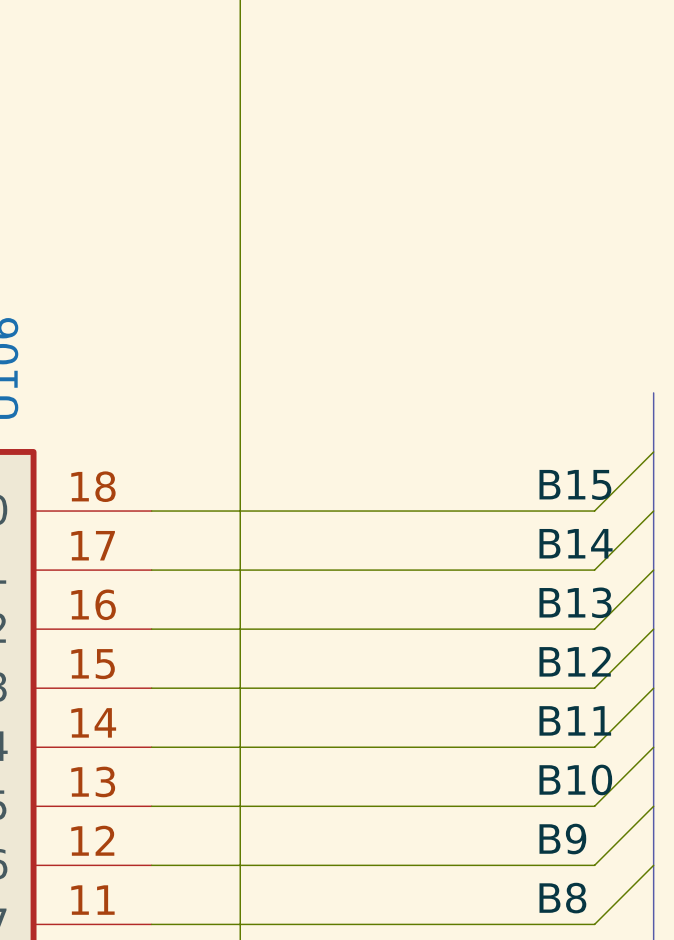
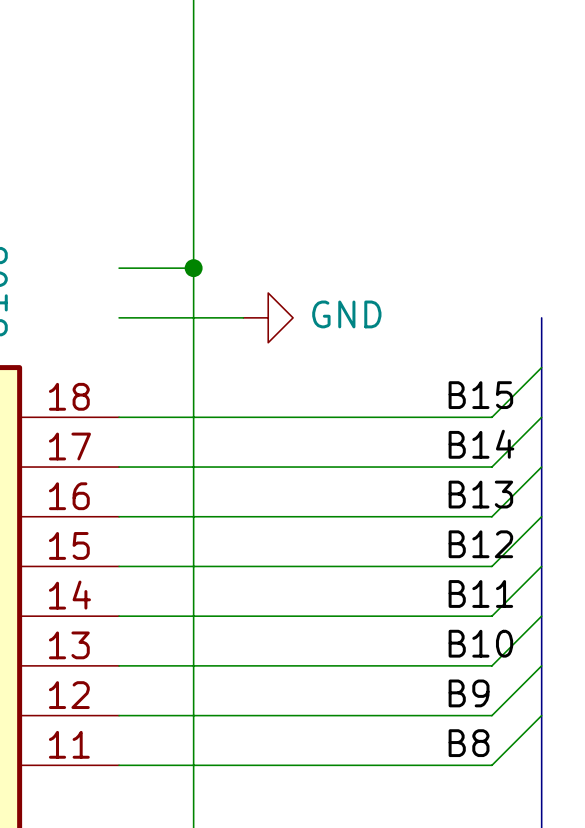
wire: none -> (119, 268) (193, 268)
junction: none -> (193, 268)
wire: none -> (119, 317) (243, 317)
power symbol: none -> GND (268, 317)

